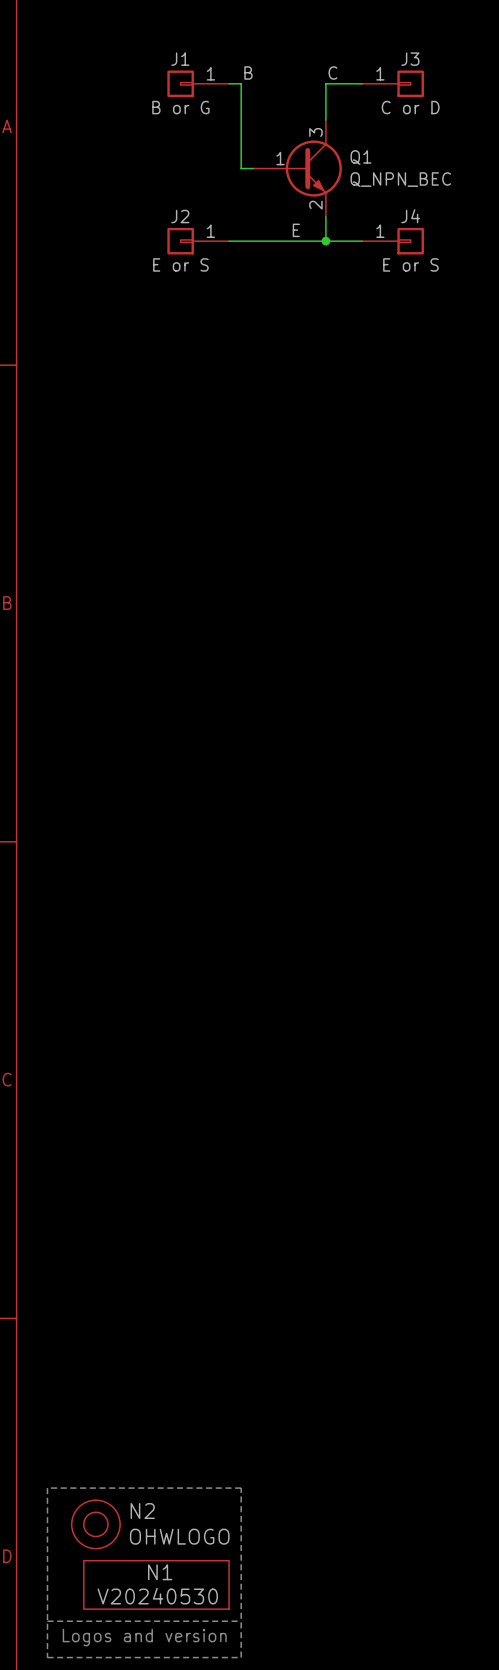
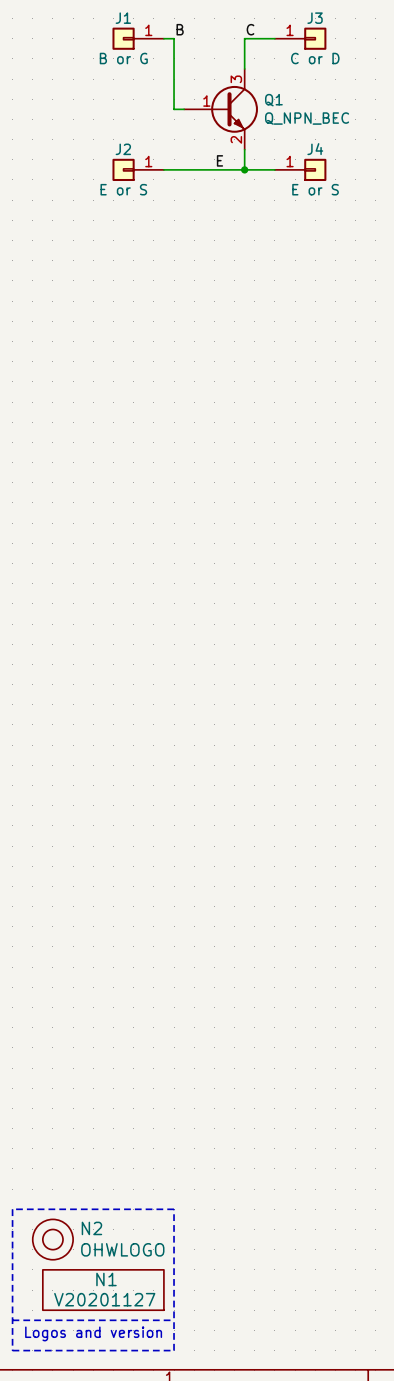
N1 value: V20240530 (157, 1596) -> V20201127 (104, 1299)

